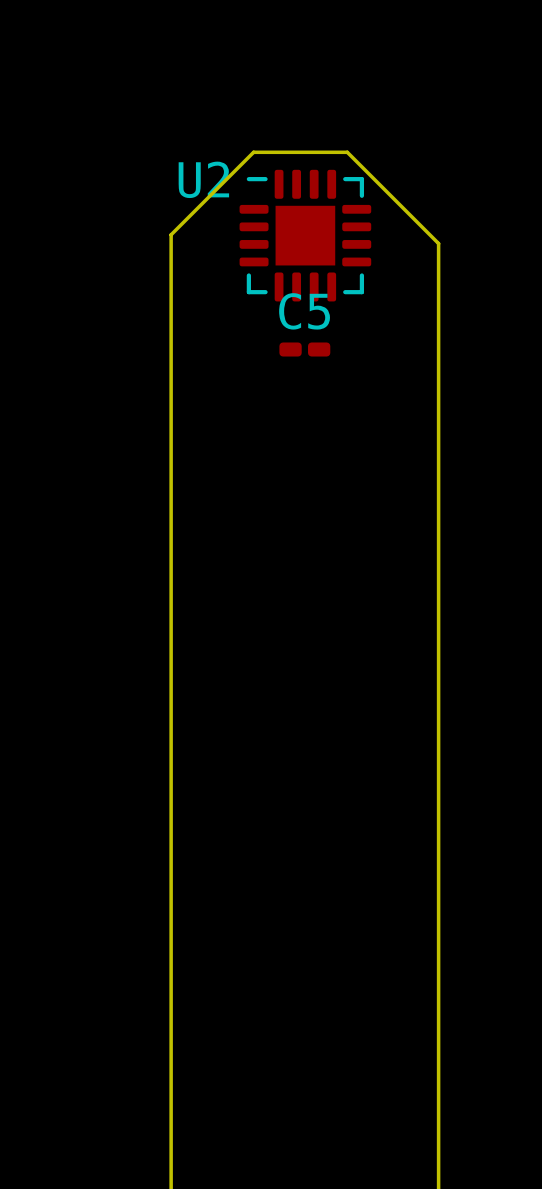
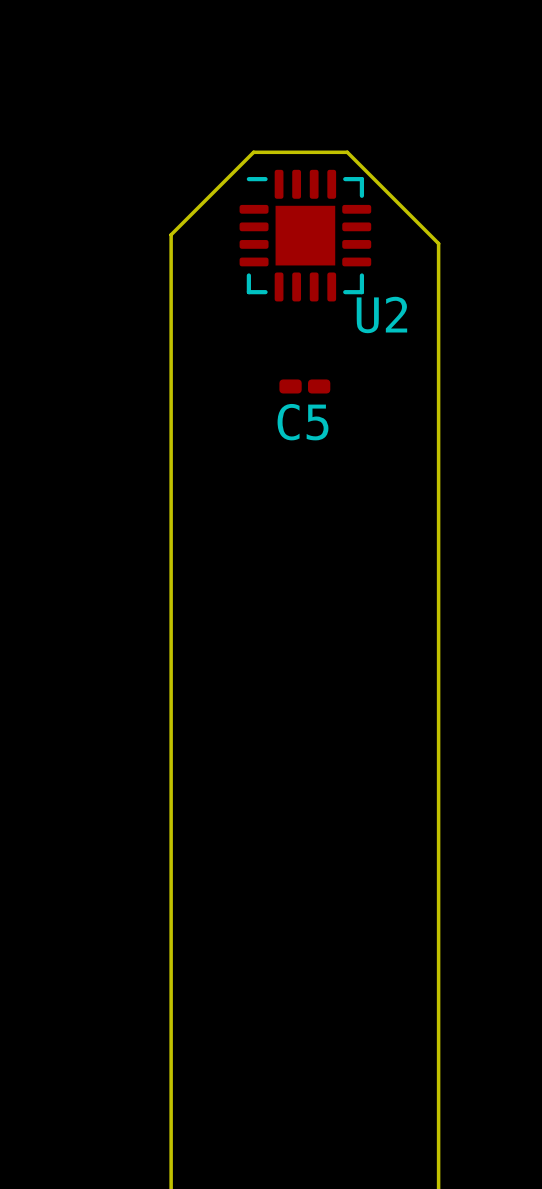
U2 name position: U2 (203, 179) -> U2 (381, 314)
C5 name position: C5 (304, 311) -> C5 (302, 422)
C5 position: (304, 349) -> (304, 386)

